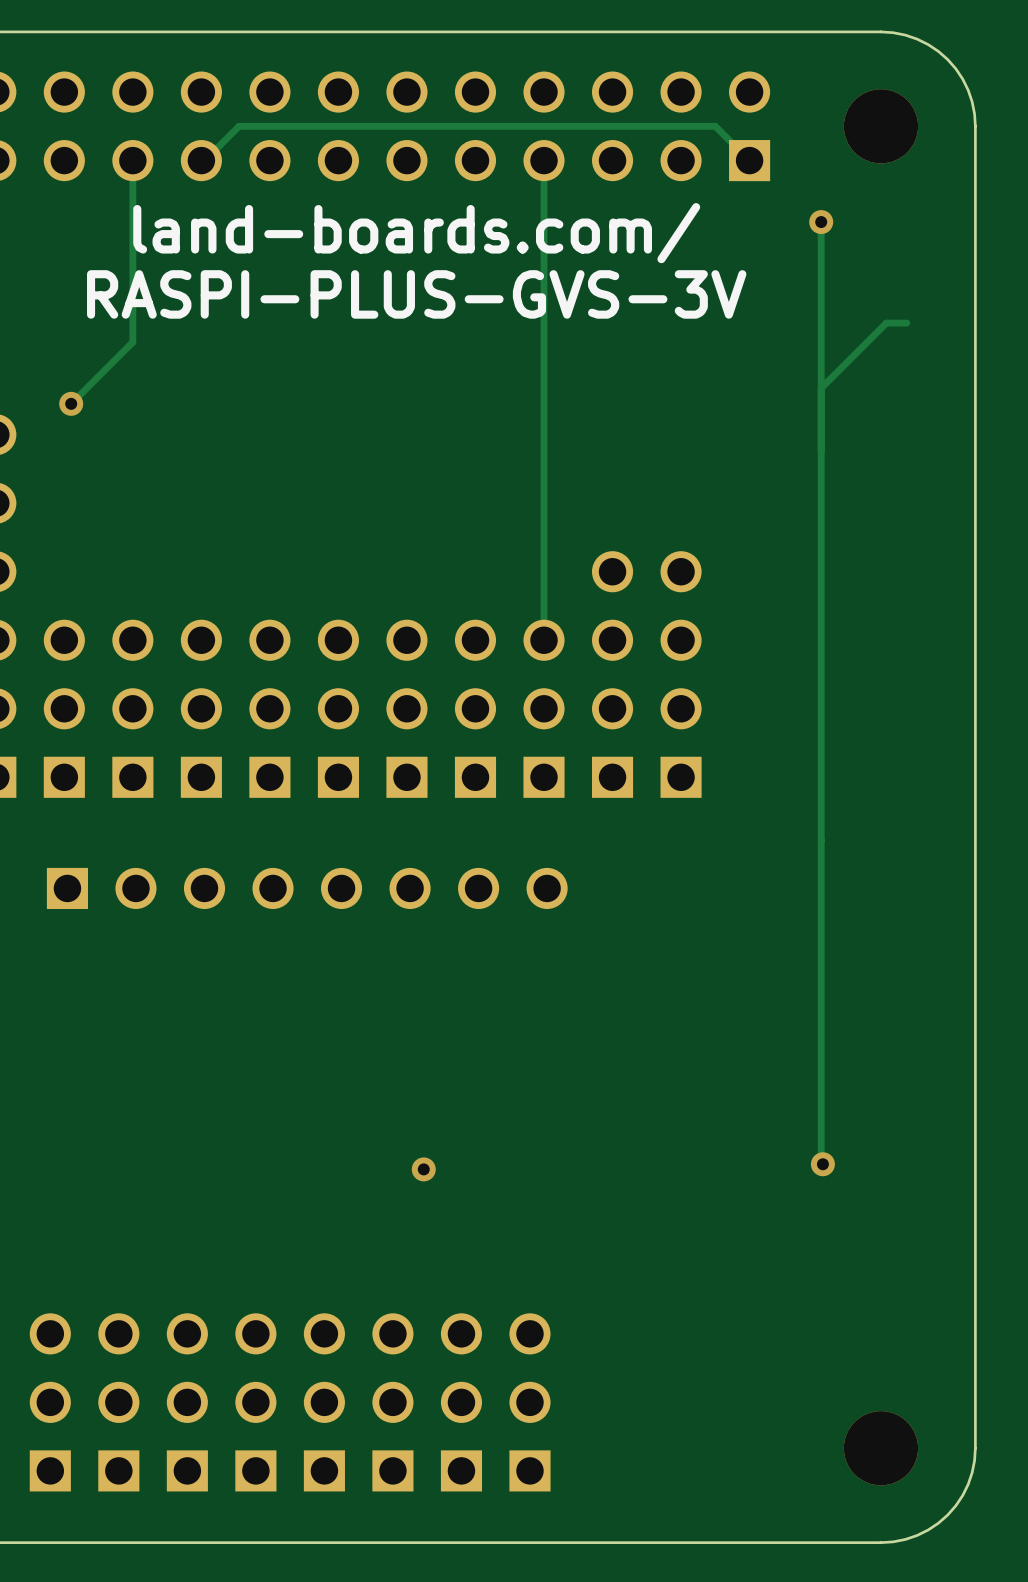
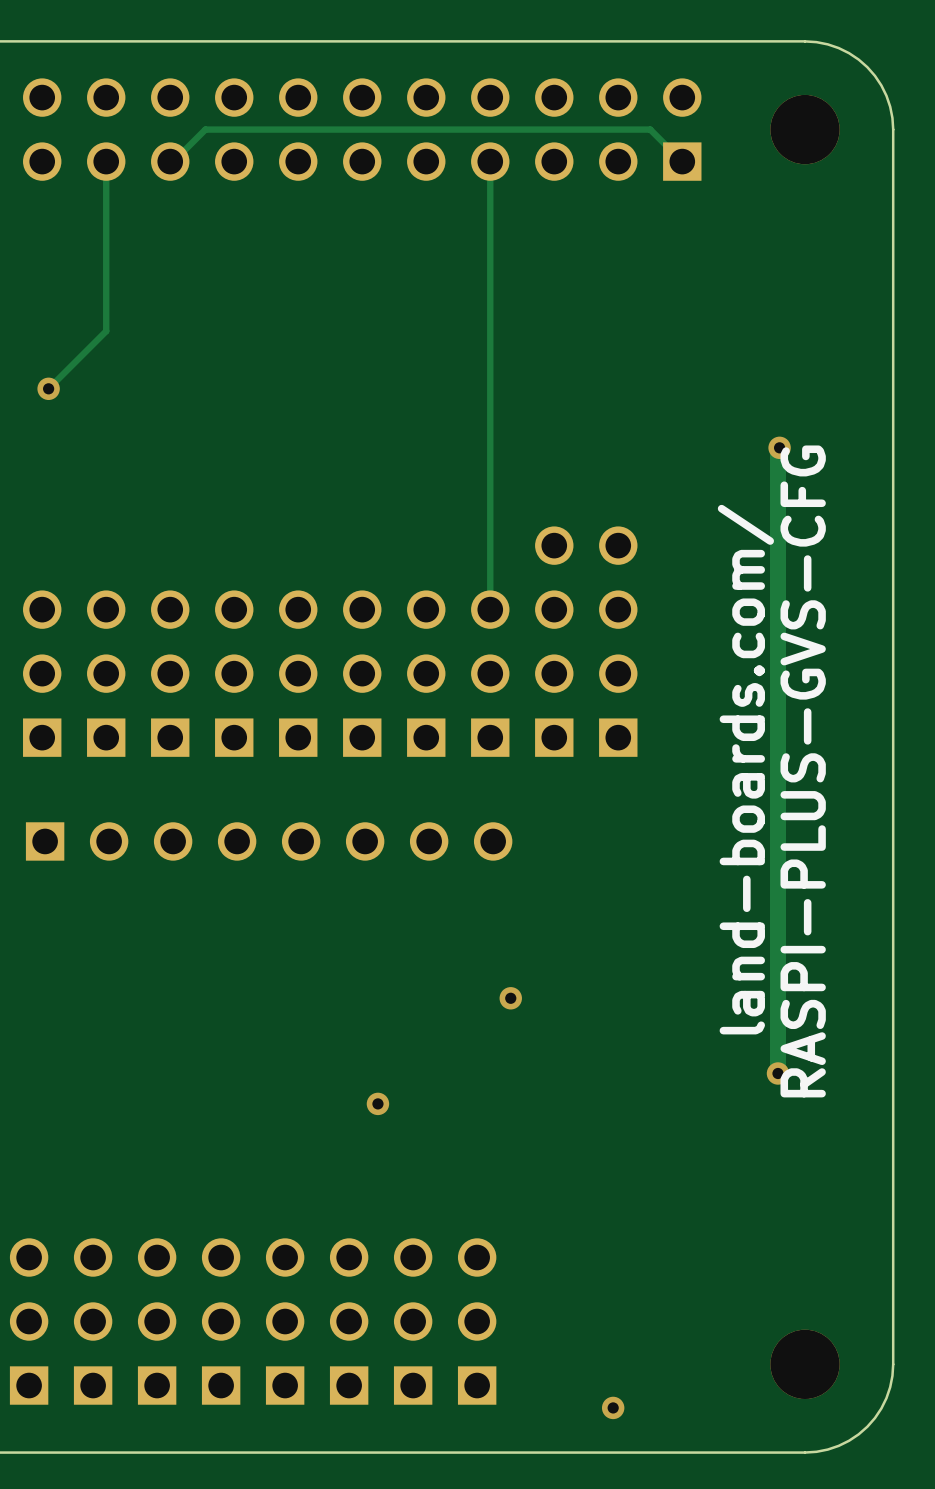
track: (821, 222) (821, 1162) (822, 1164) -> none
via: (821, 222) -> none
text: land-boards.com/ (416, 233) -> none
text: RASPI-PLUS-GVS-3V (416, 294) -> none
track: (906, 323) (886, 323) (821, 388) -> none
track: none -> (779, 447) (777, 449) (777, 1073)
via: none -> (779, 447)
text: none -> land-boards.com/ (745, 769)
text: none -> RASPI-PLUS-GVS-CFG (803, 771)
via: none -> (510, 998)
via position: (822, 1164) -> (777, 1073)
via: none -> (613, 1407)

